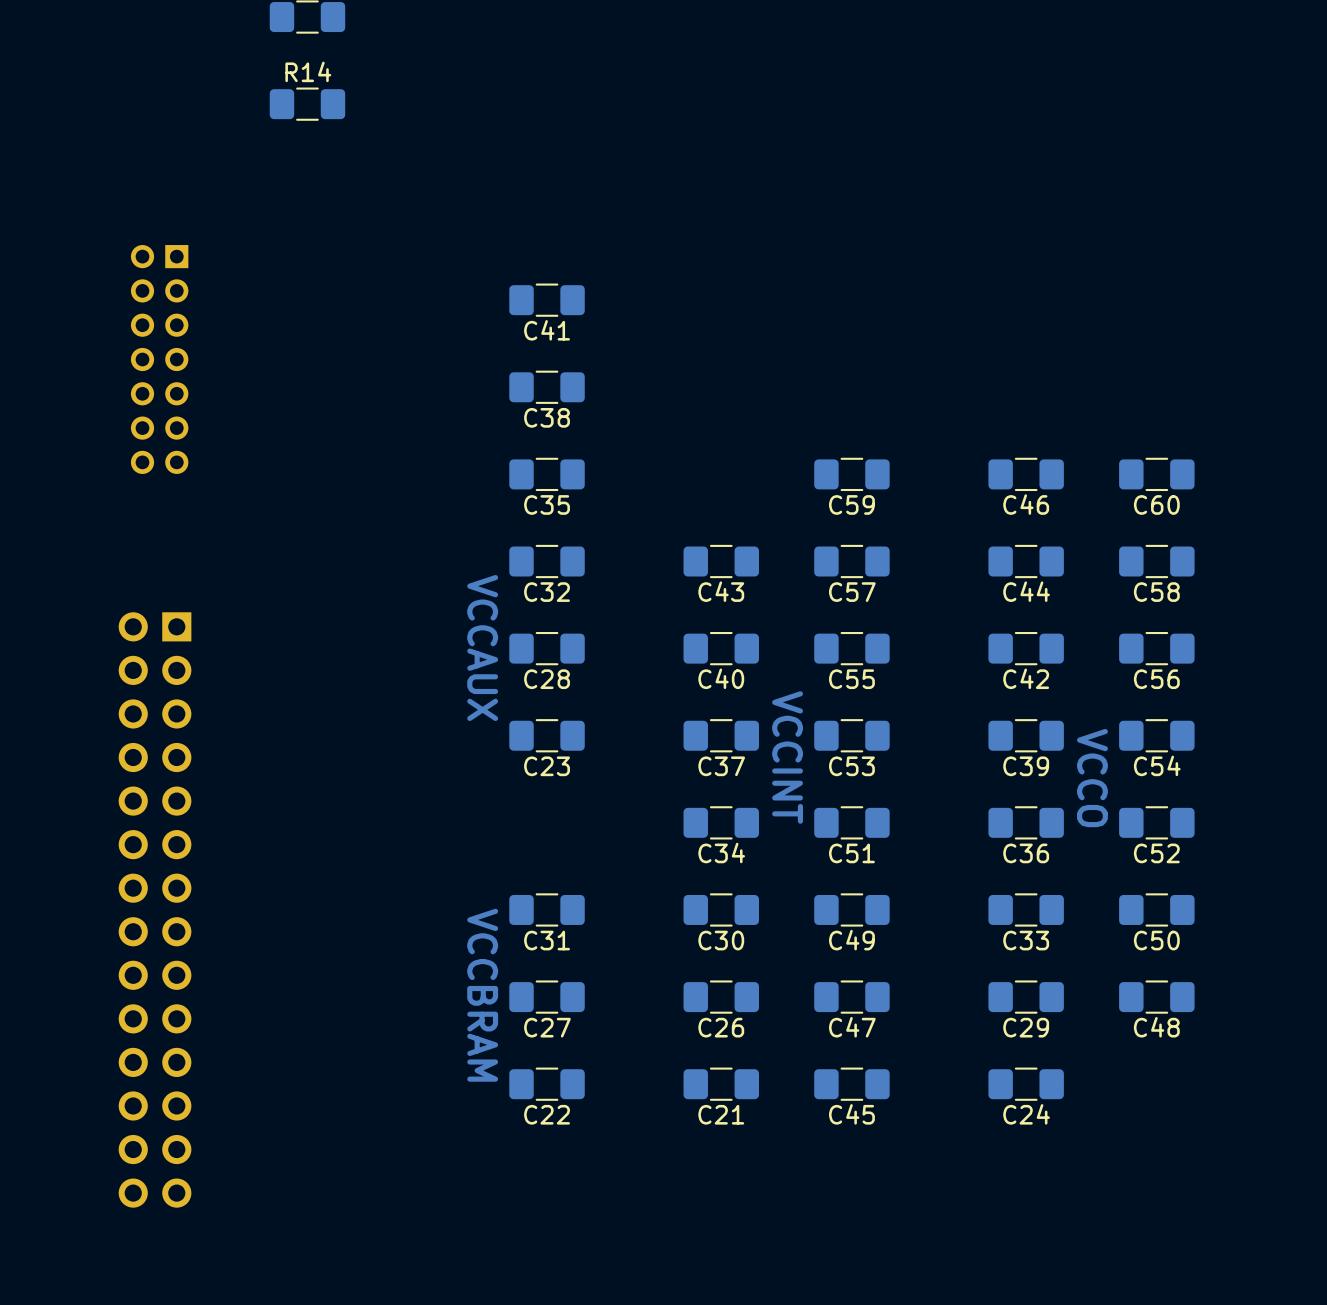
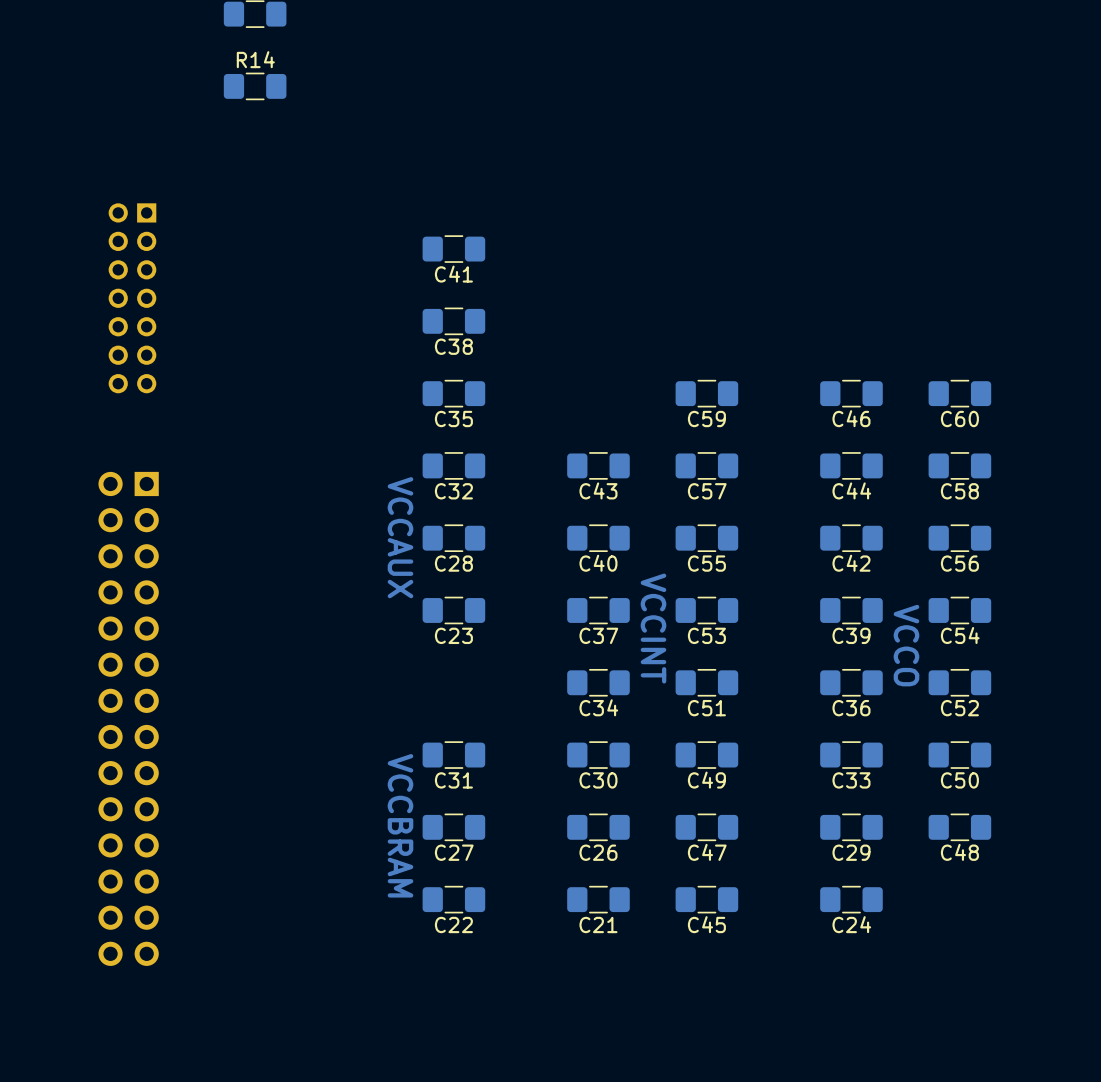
part position: (155, 909) -> (128, 718)

